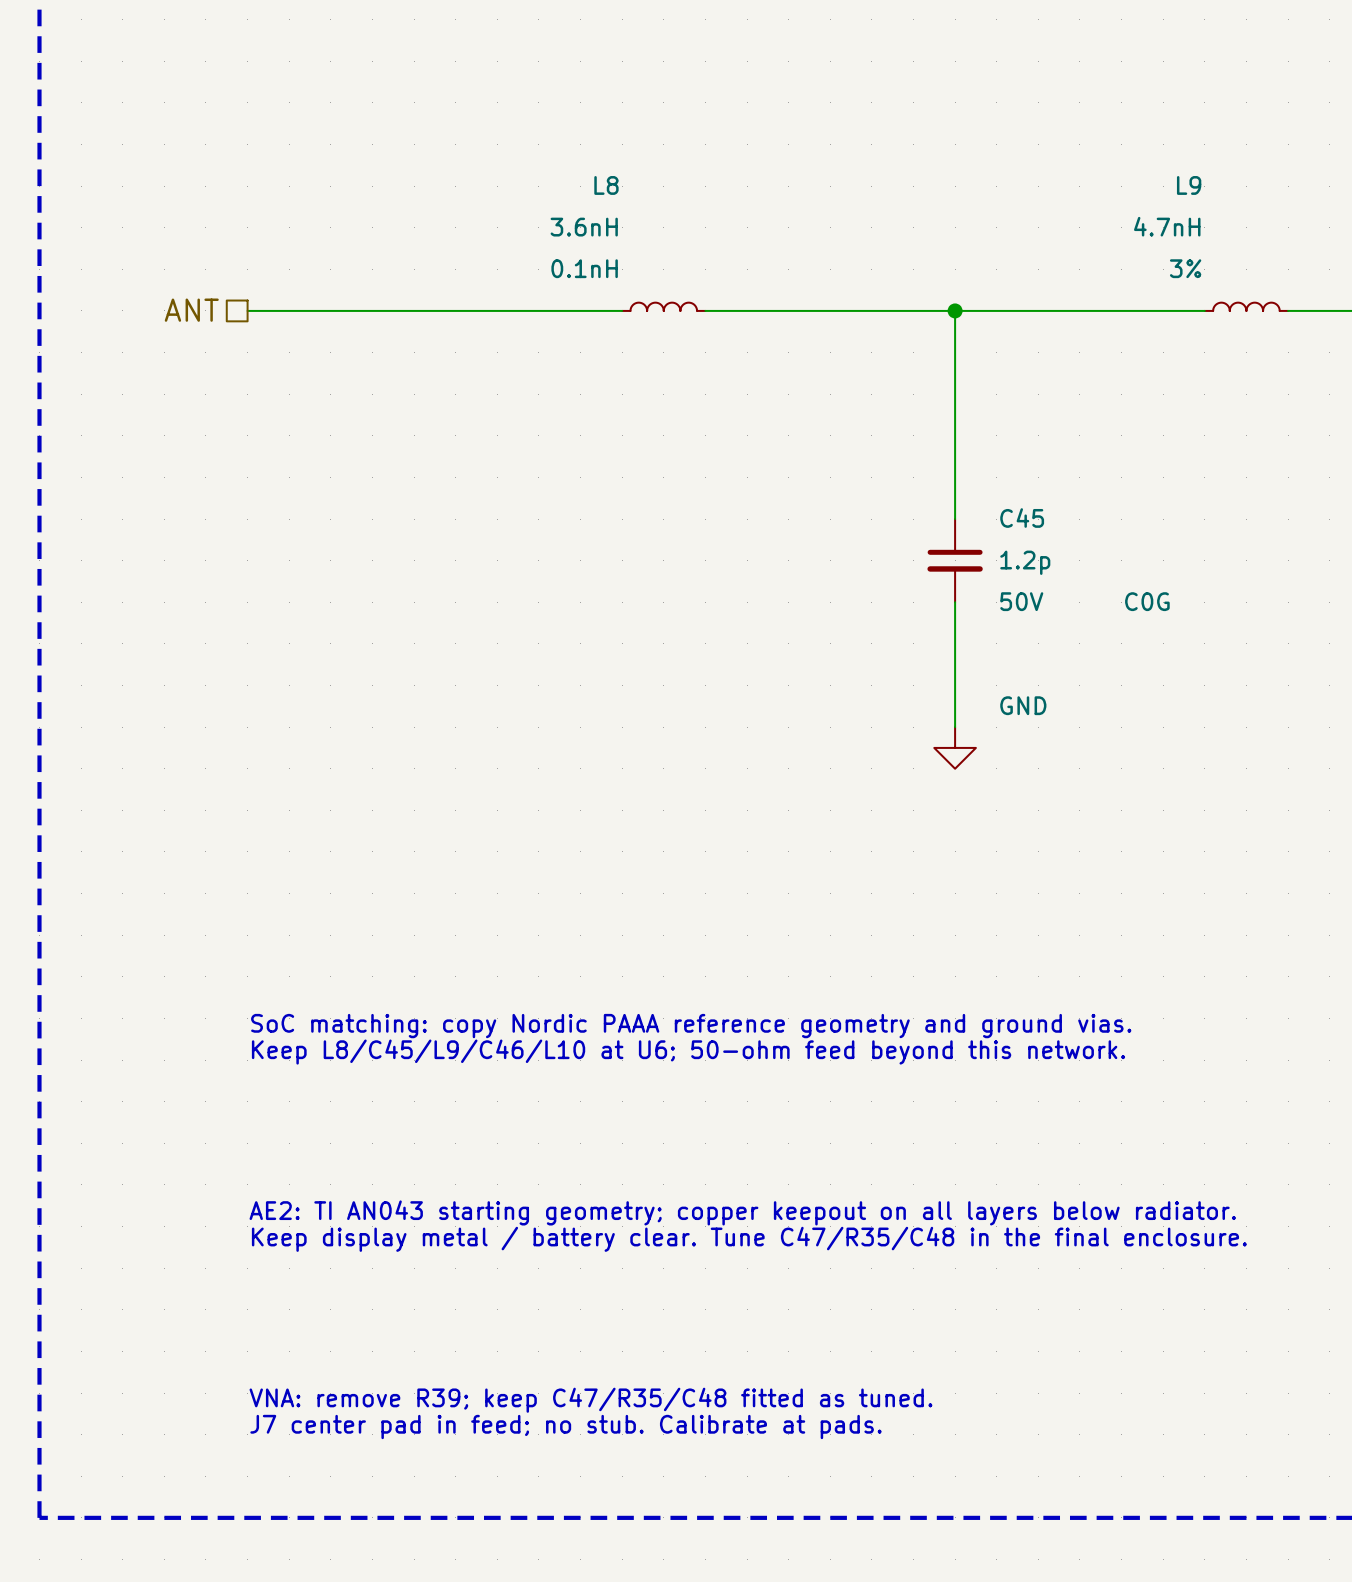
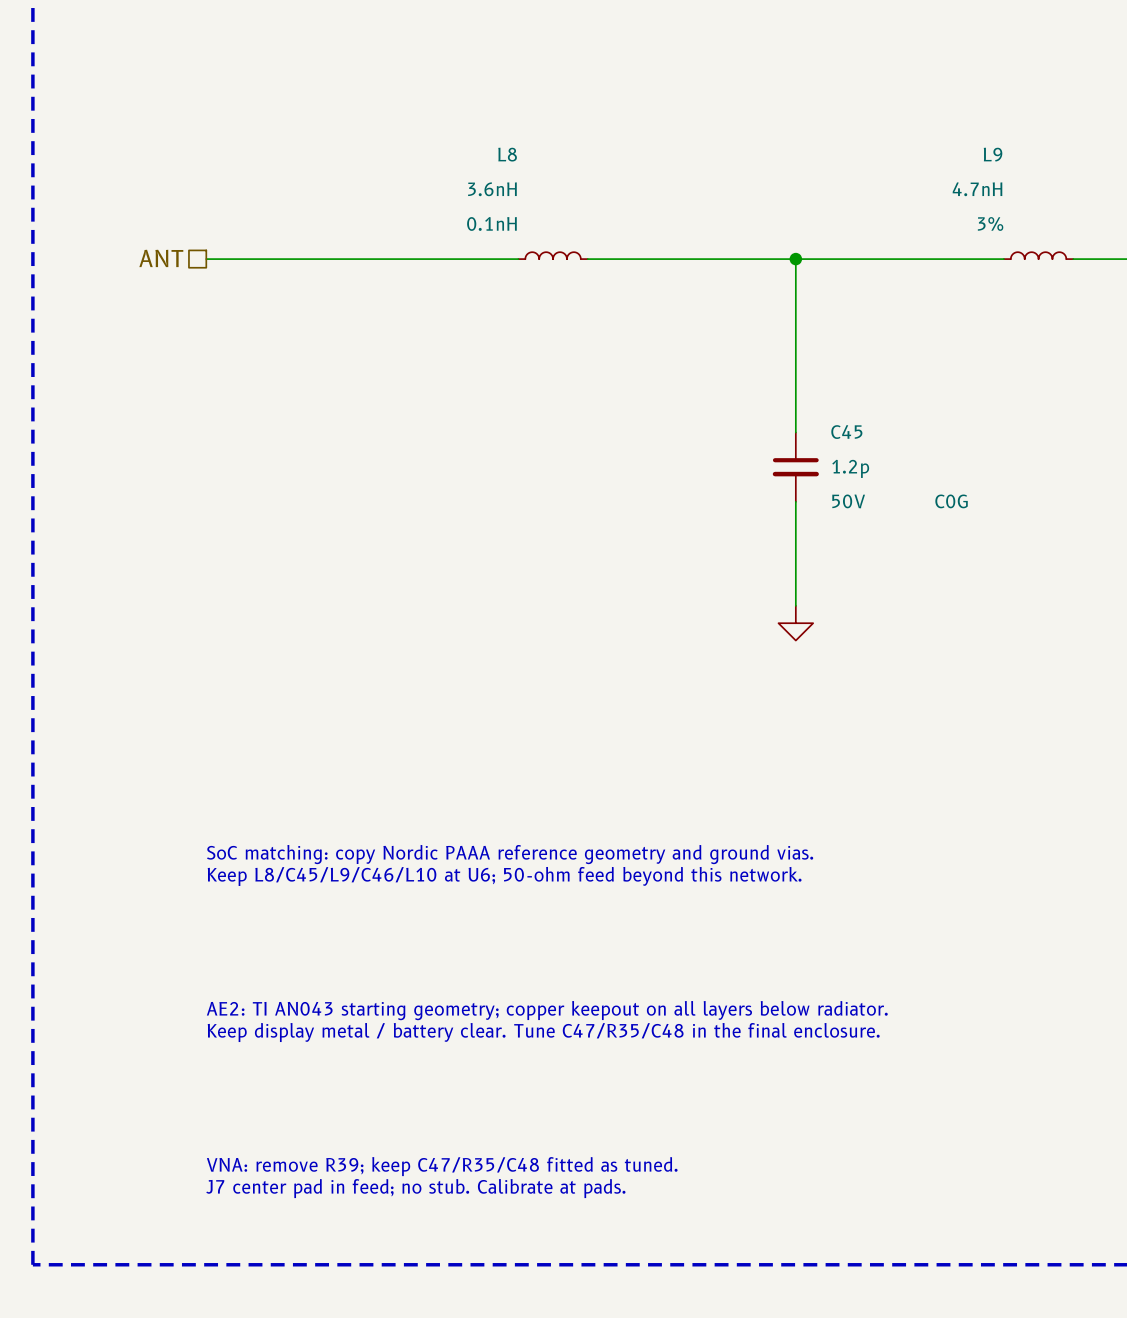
power symbol text: GND (1023, 705) -> none

